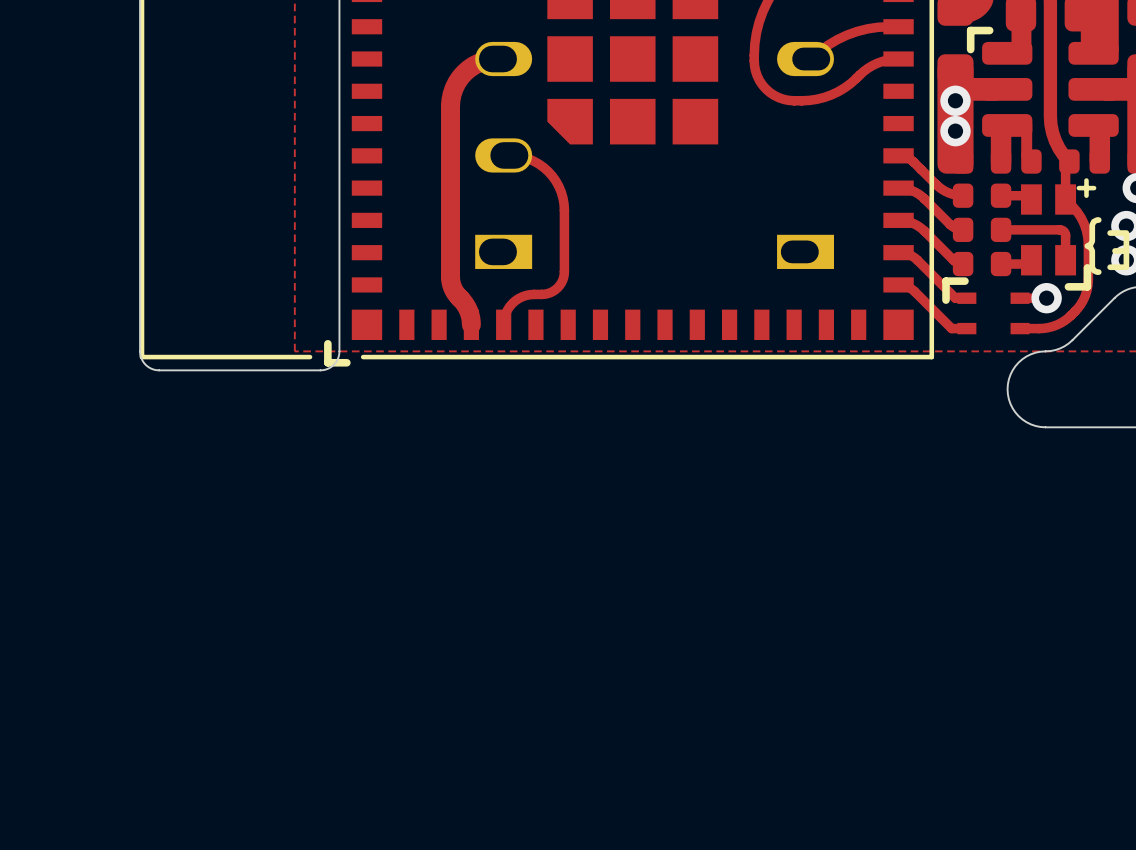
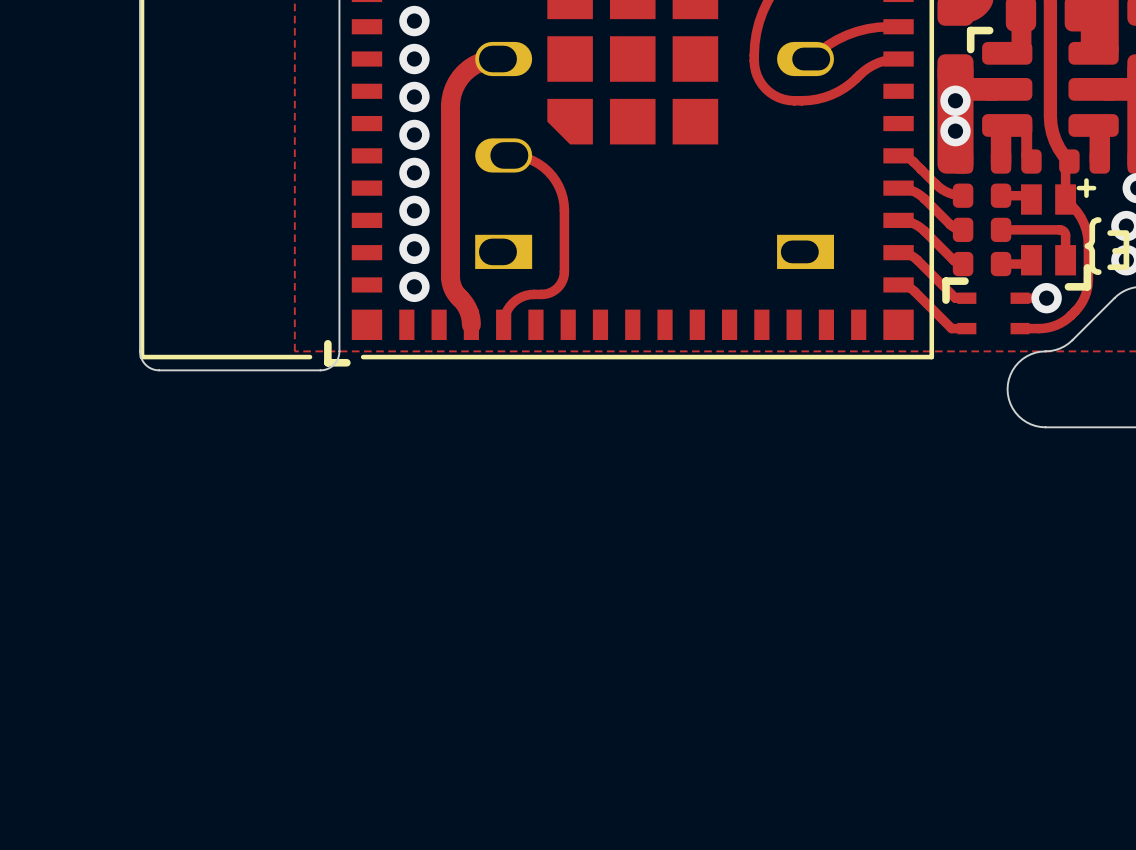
via: none -> (414, 21)
via: none -> (414, 59)
via: none -> (414, 96)
via: none -> (414, 134)
via: none -> (414, 172)
via: none -> (414, 210)
via: none -> (414, 248)
via: none -> (414, 286)

